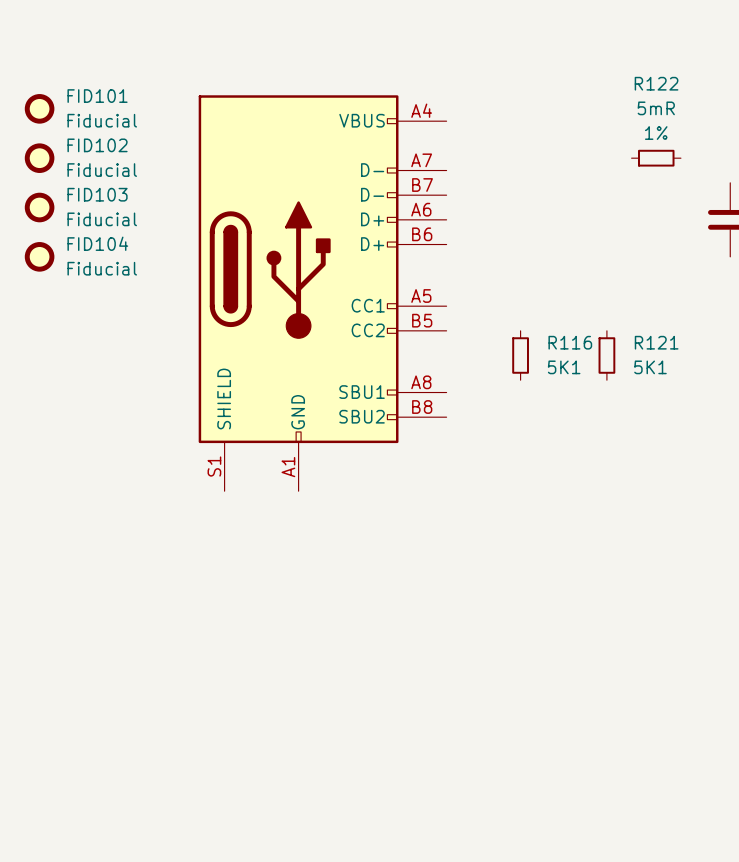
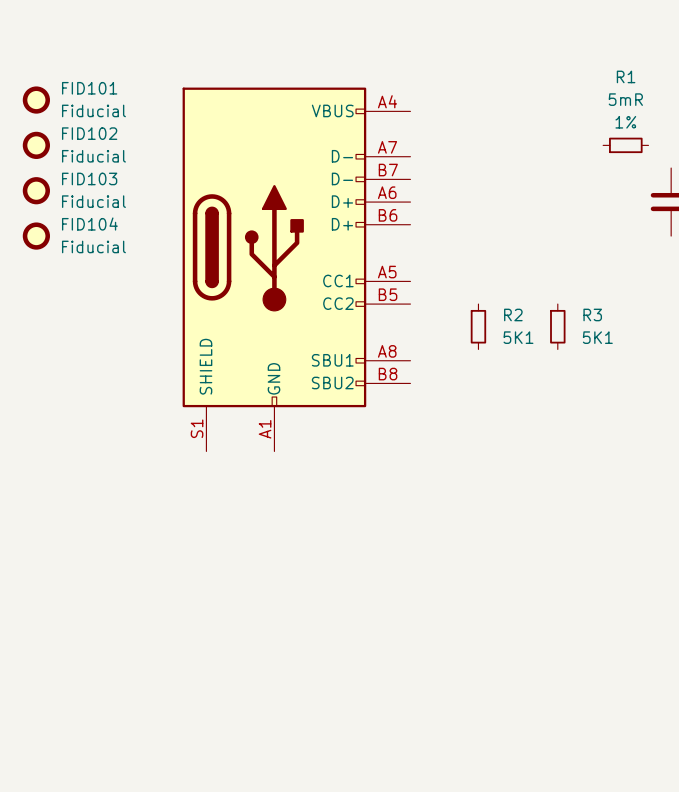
R122: 5mR (656, 158) -> none
R1: none -> 5mR (625, 145)
R116 name: R116 (570, 342) -> R2 (513, 314)
R121 name: R121 (656, 342) -> R3 (592, 314)

